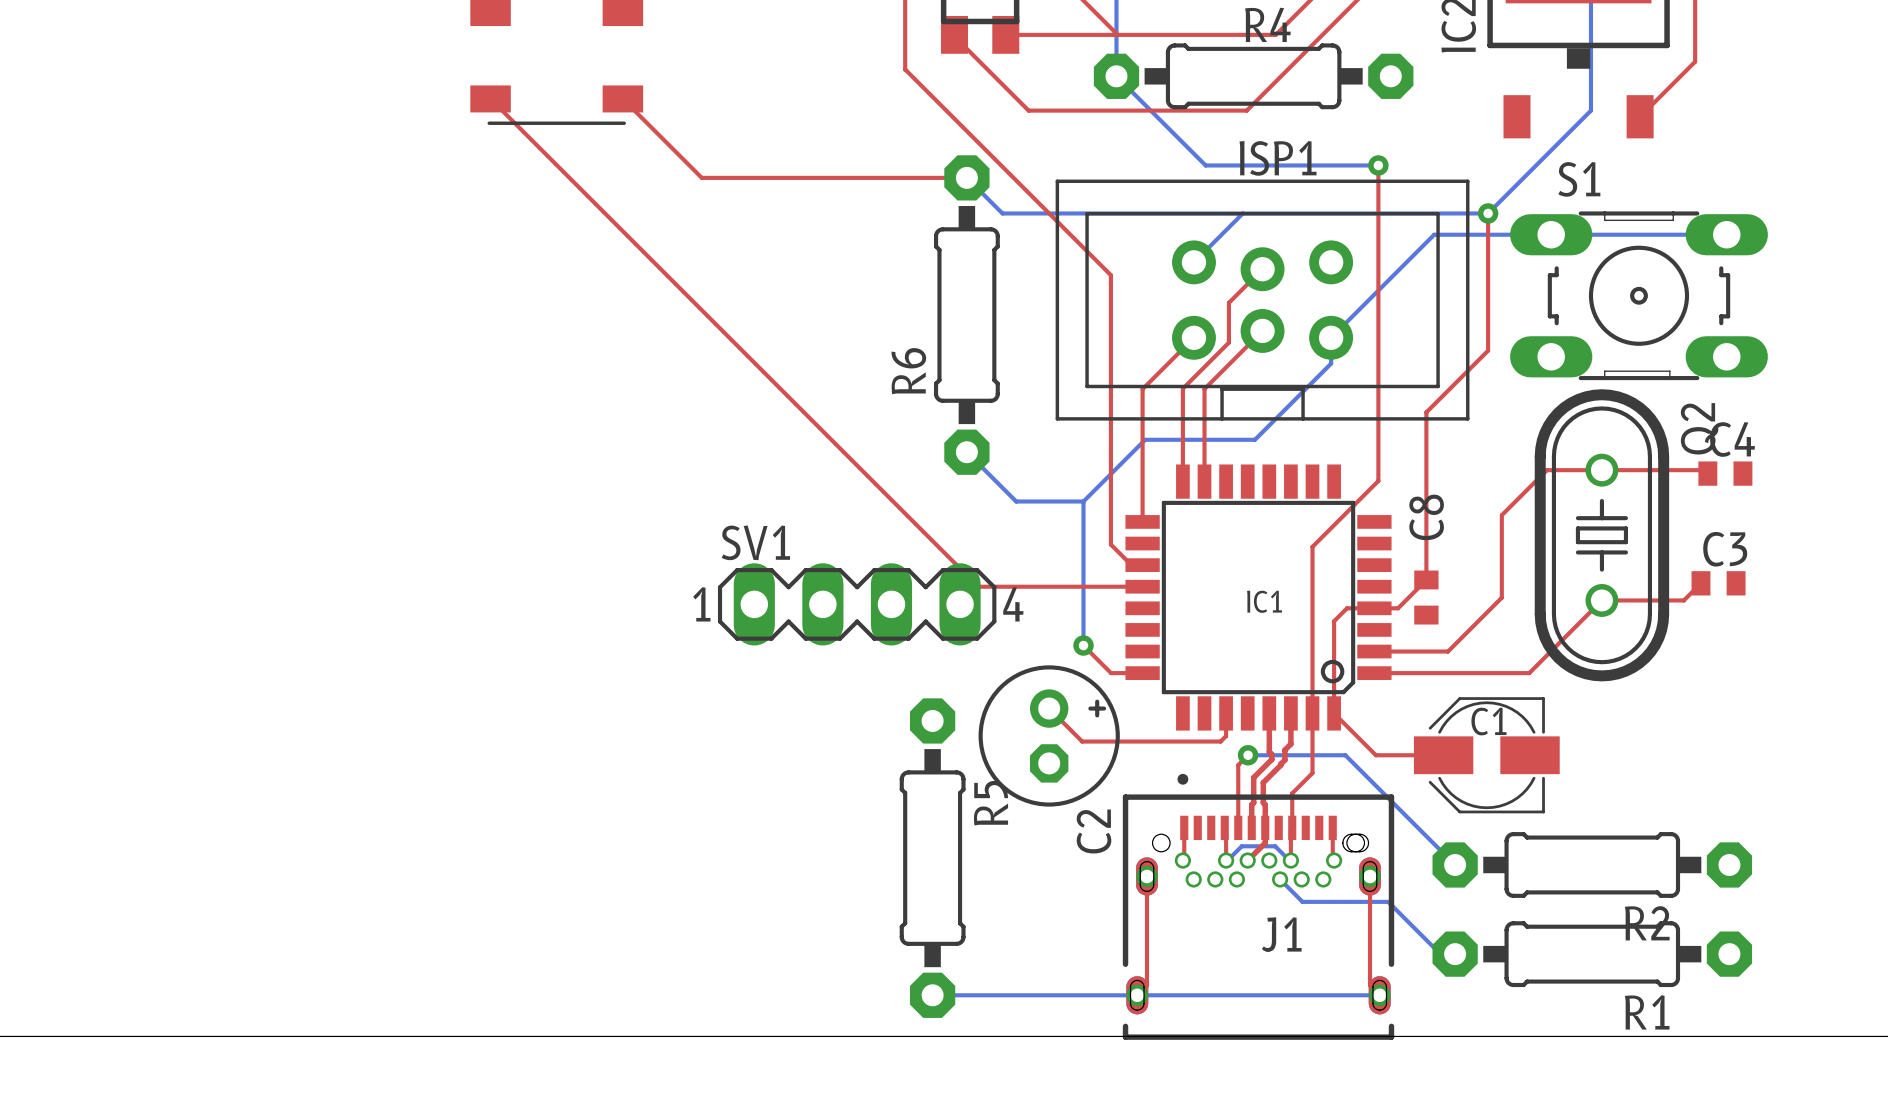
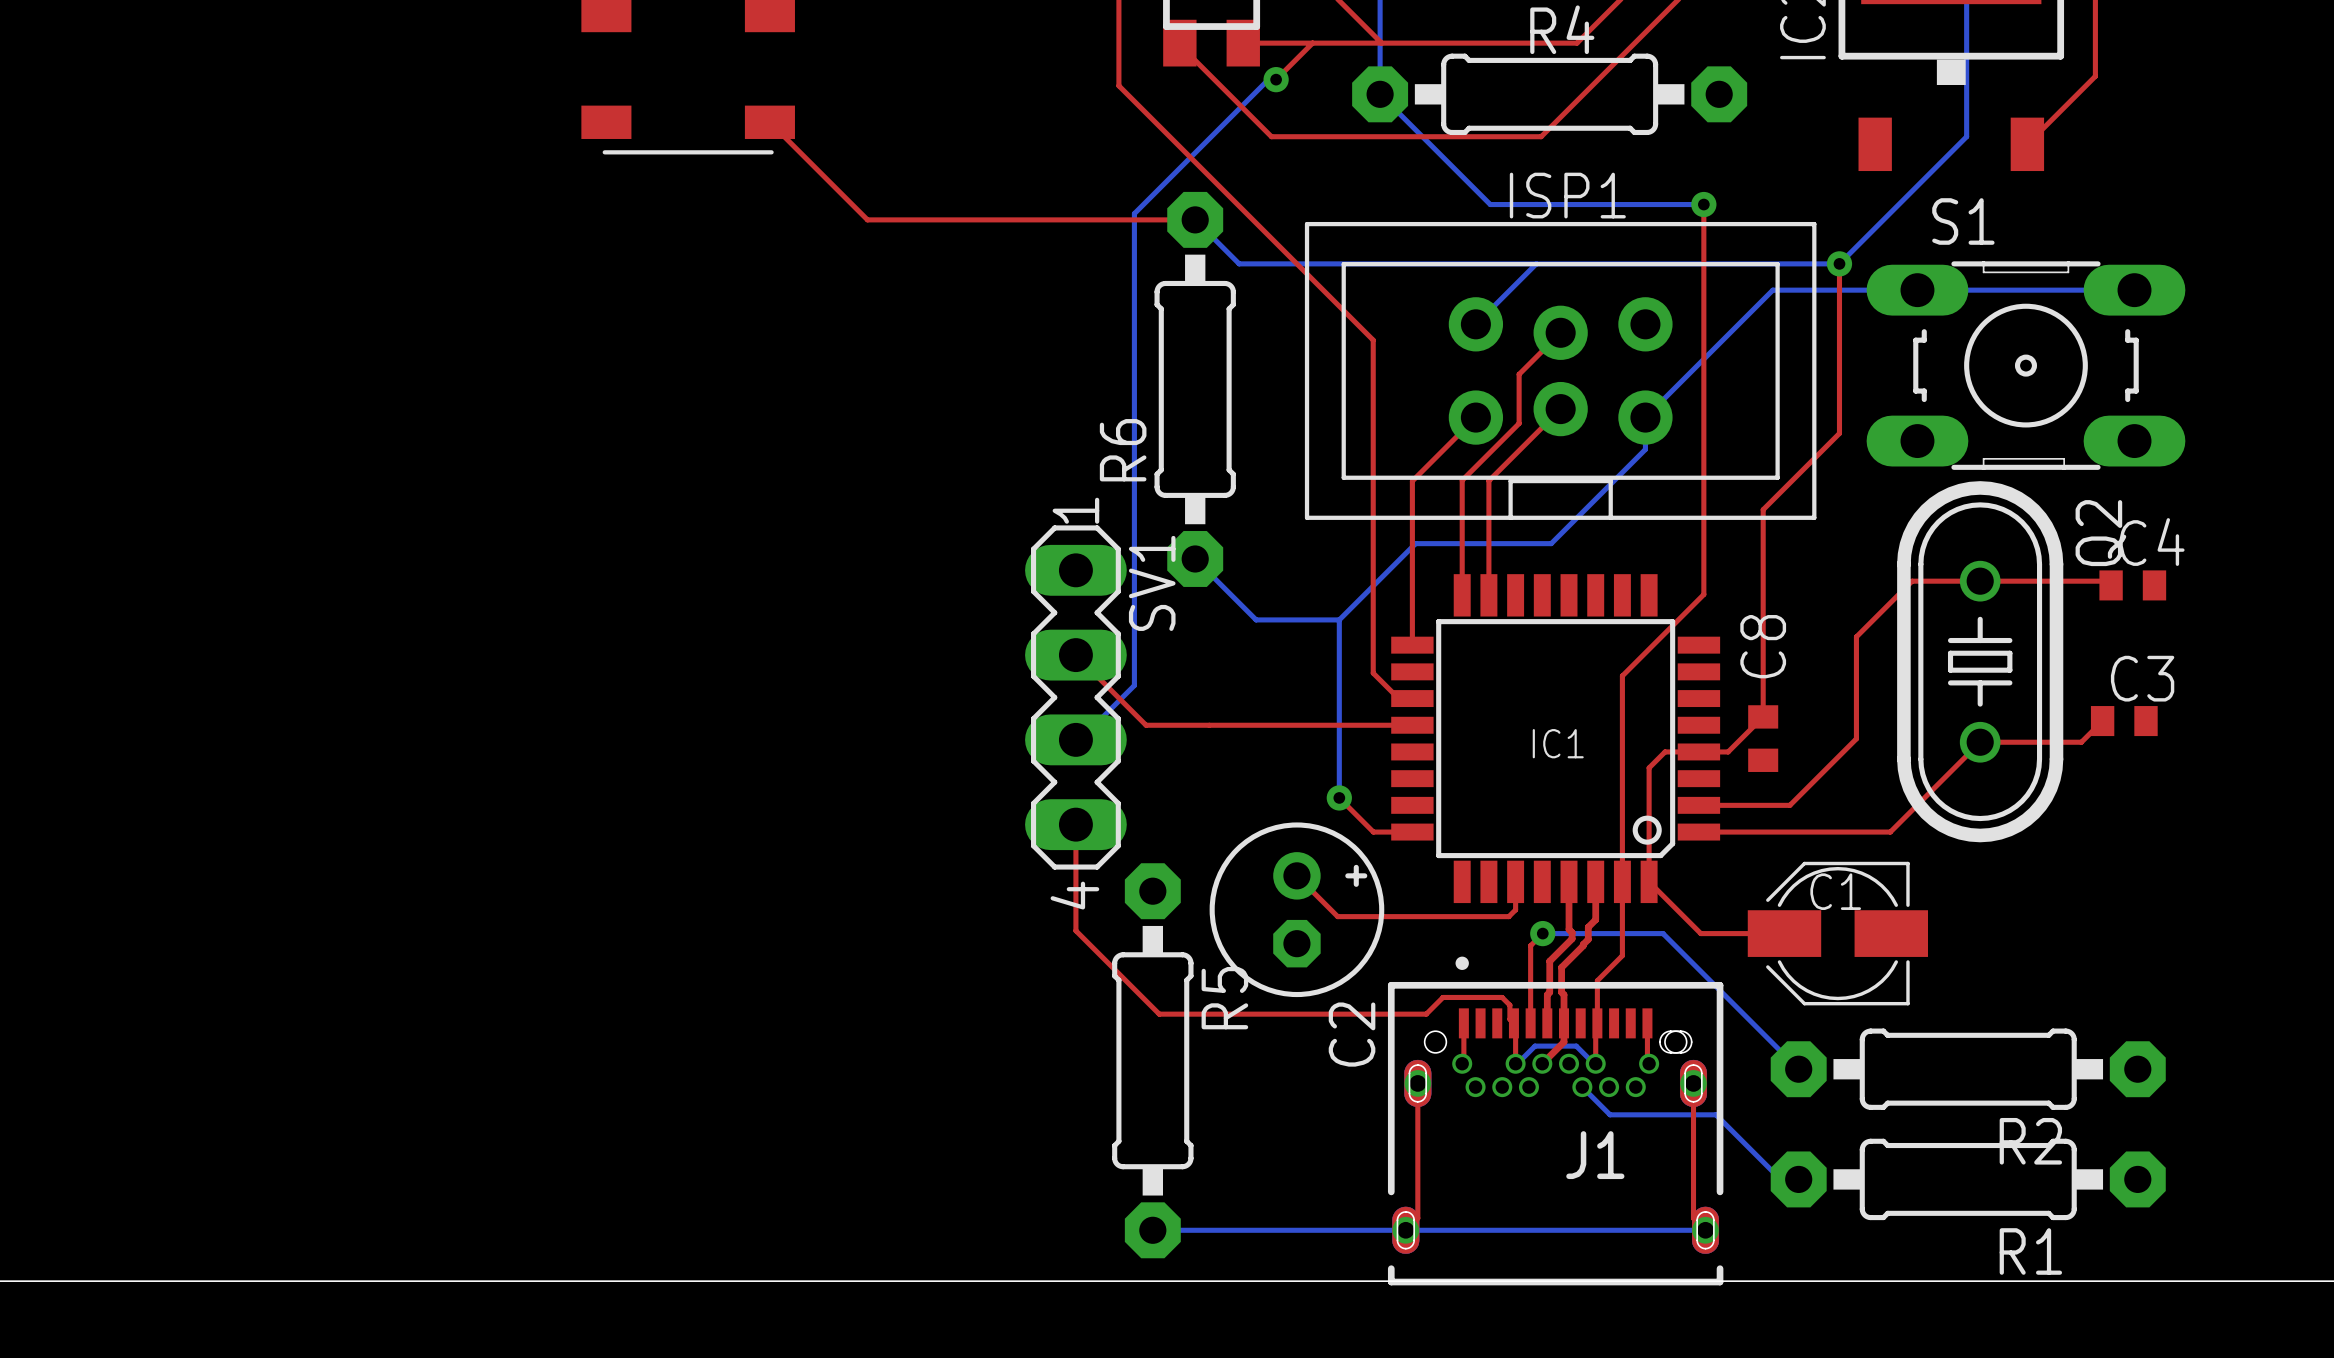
top track: none -> (1312, 43) (1276, 79)
bottom track: none -> (1276, 79) (1268, 79) (1134, 213) (1134, 685) (1080, 739) (1075, 739)
via: none -> (1276, 79)
top track: (490, 98) (978, 586) -> (1075, 655) (1146, 725) (1209, 725)
SV1 name position: SV1 (755, 542) -> SV1 (1152, 583)
SV1 footprint: [717, 563, 997, 646] -> [1025, 525, 1127, 870]
top track: none -> (1075, 824) (1075, 930) (1159, 1014) (1426, 1014) (1442, 997) (1502, 997) (1509, 1005) (1509, 1019) (1513, 1023)

